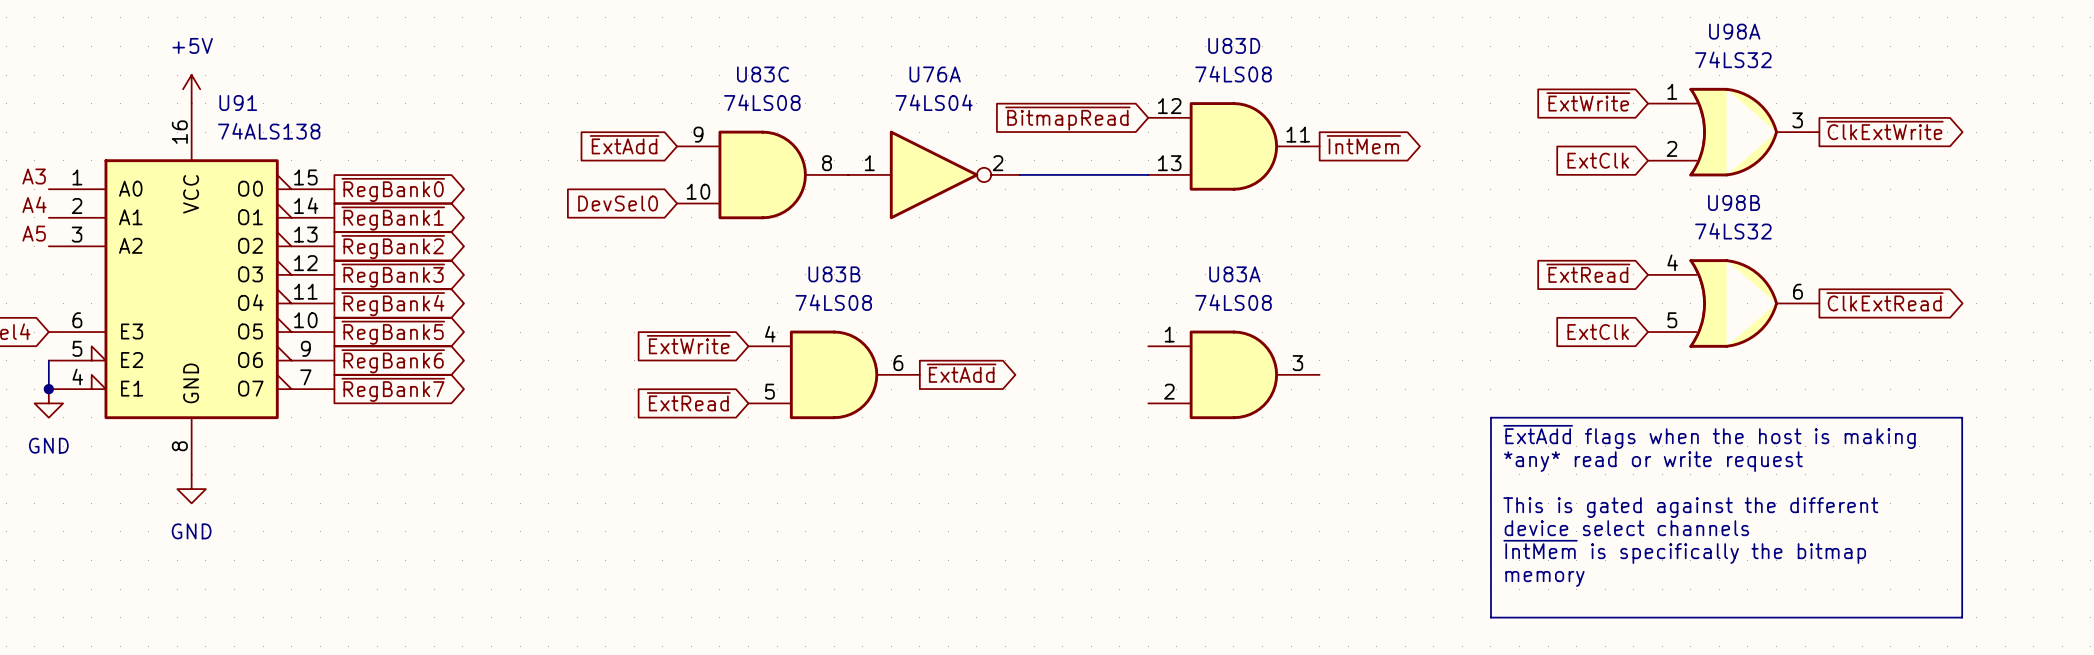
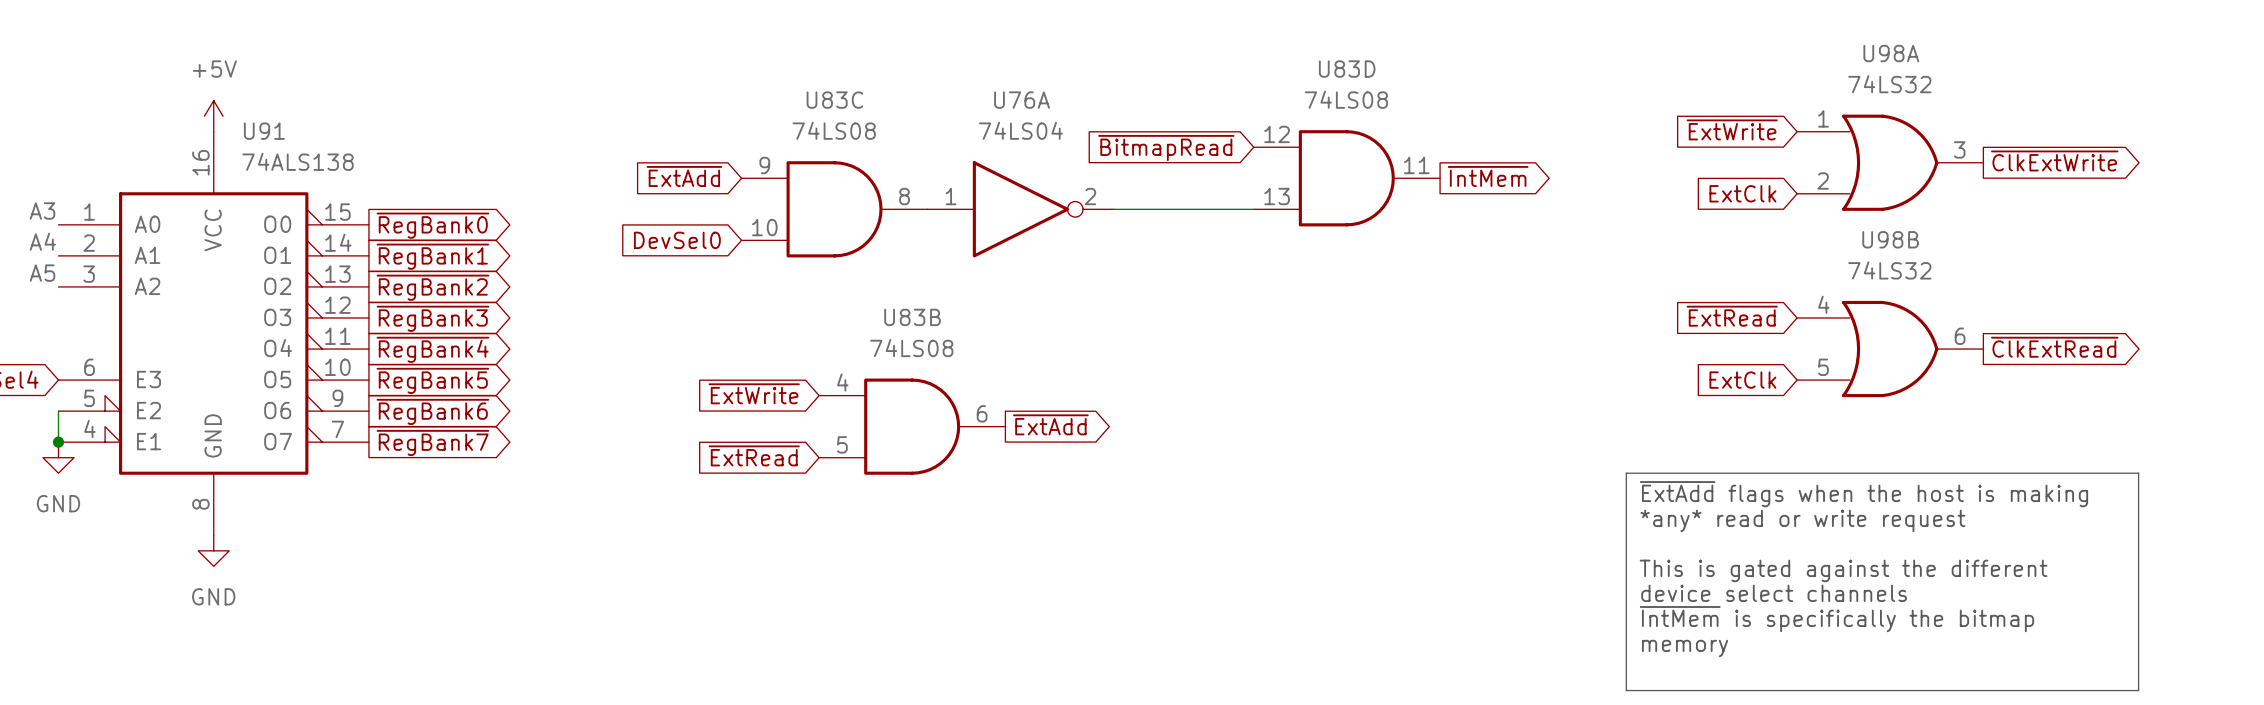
U83A: 74LS08 (1233, 374) -> none

